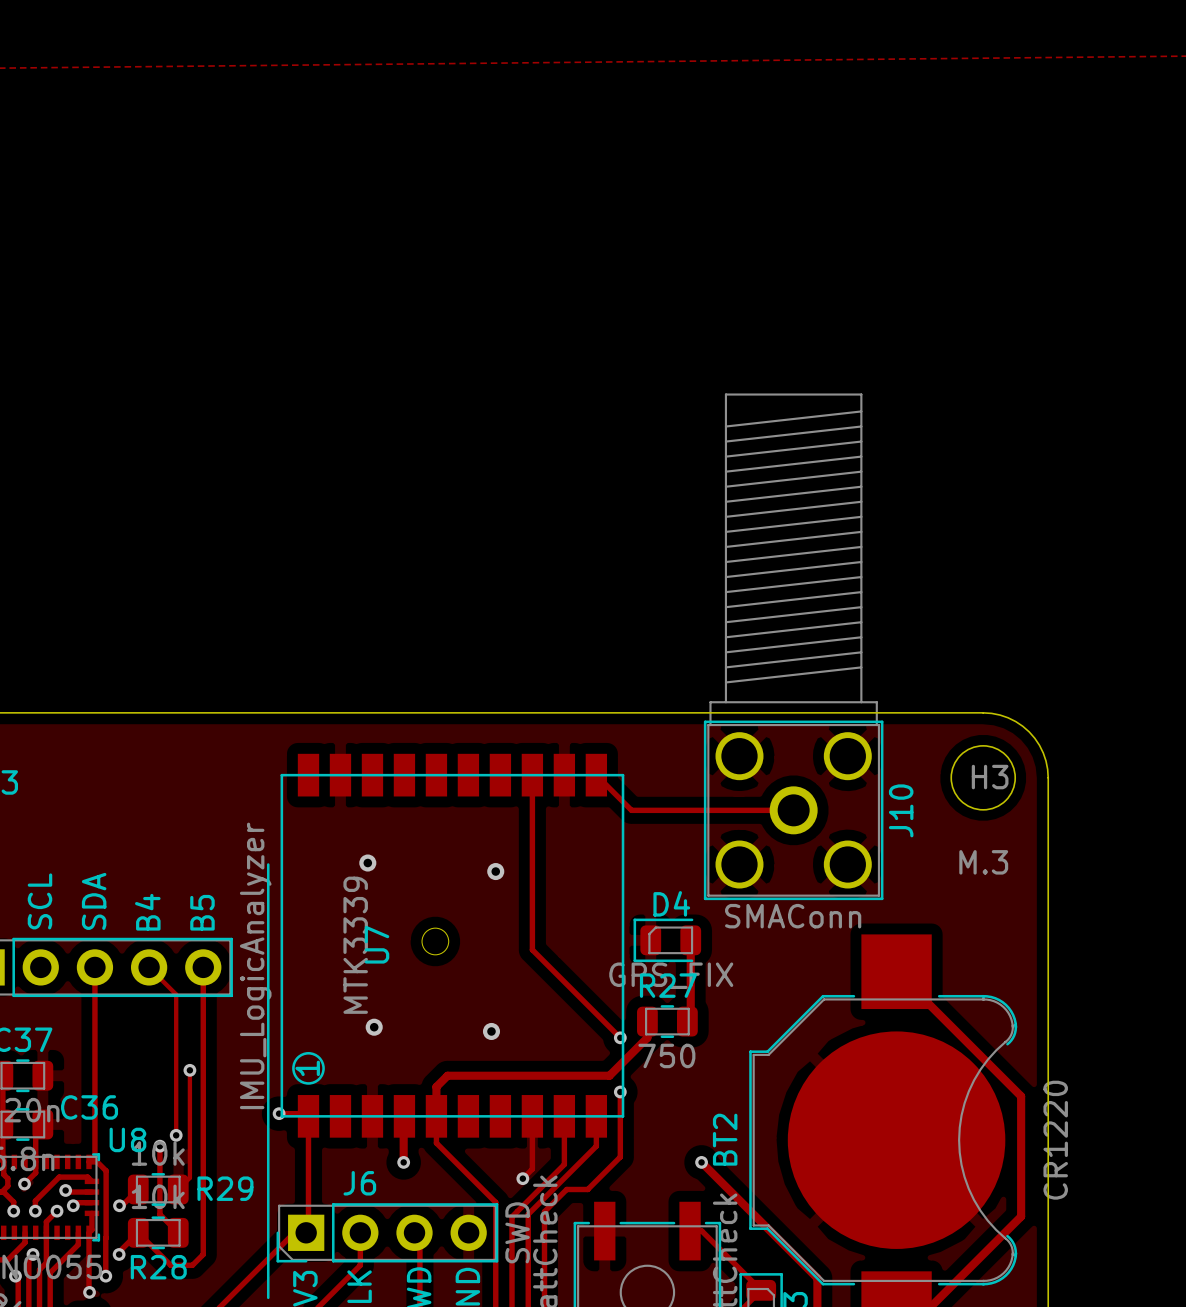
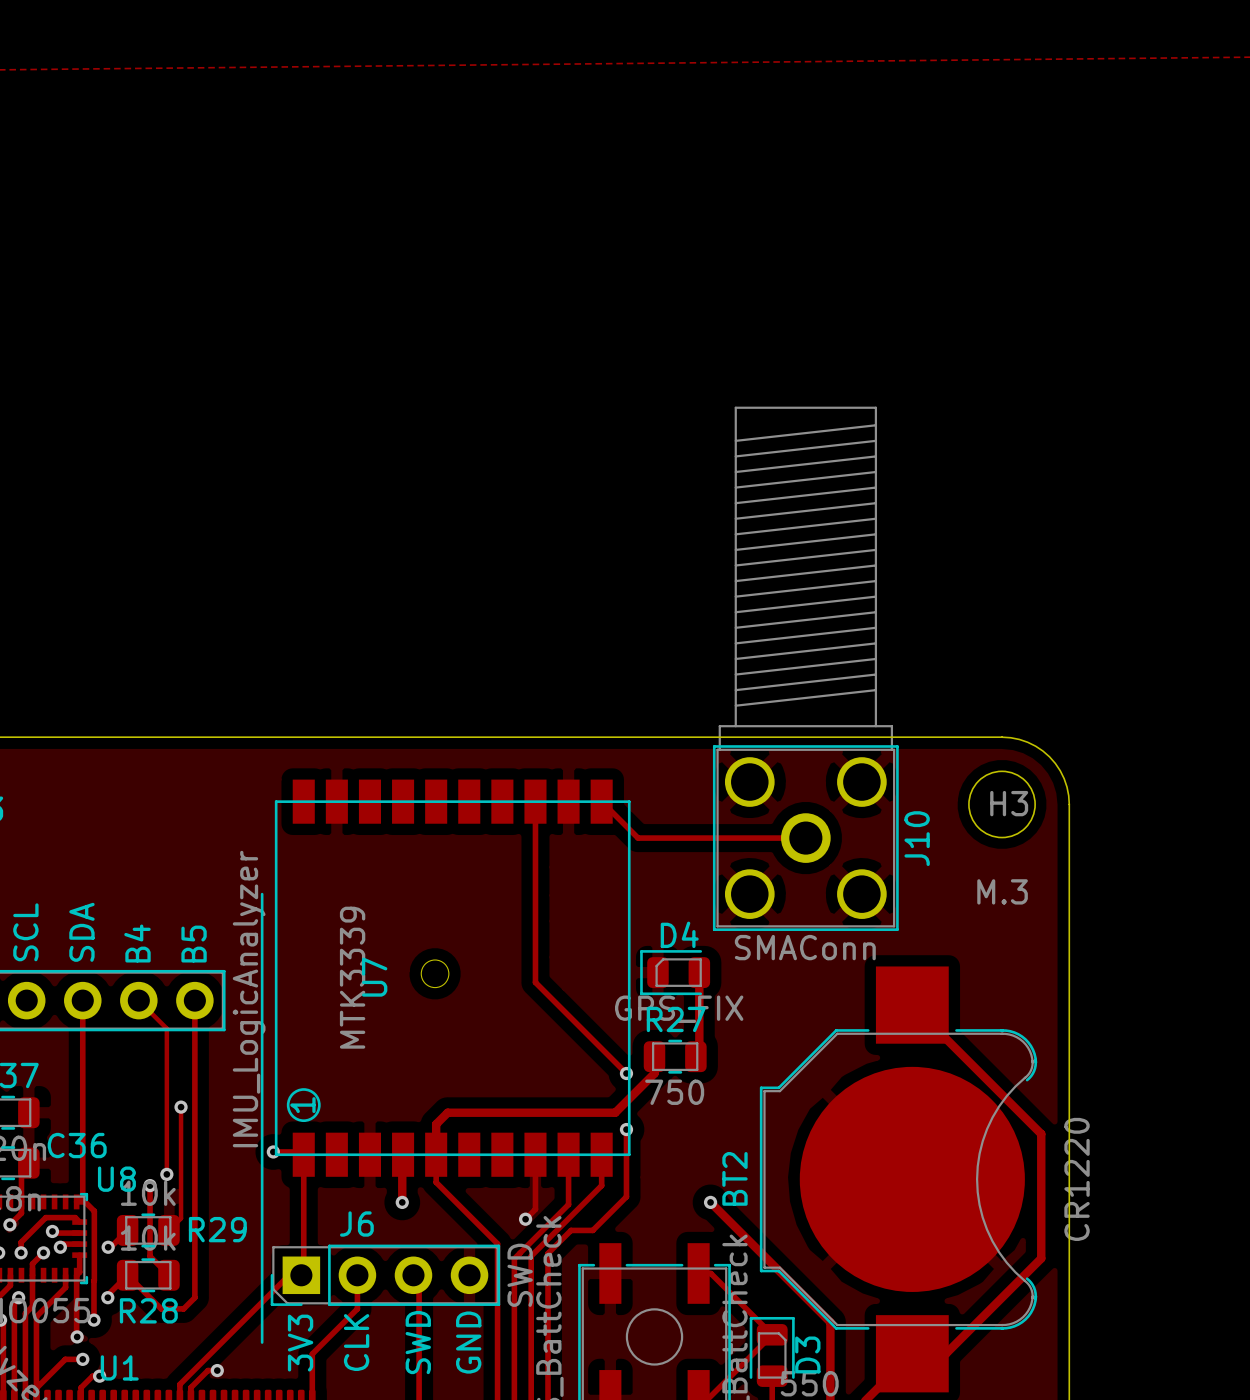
via: (367, 863) -> none
via: (495, 871) -> none
via: (374, 1027) -> none
via: (491, 1031) -> none

